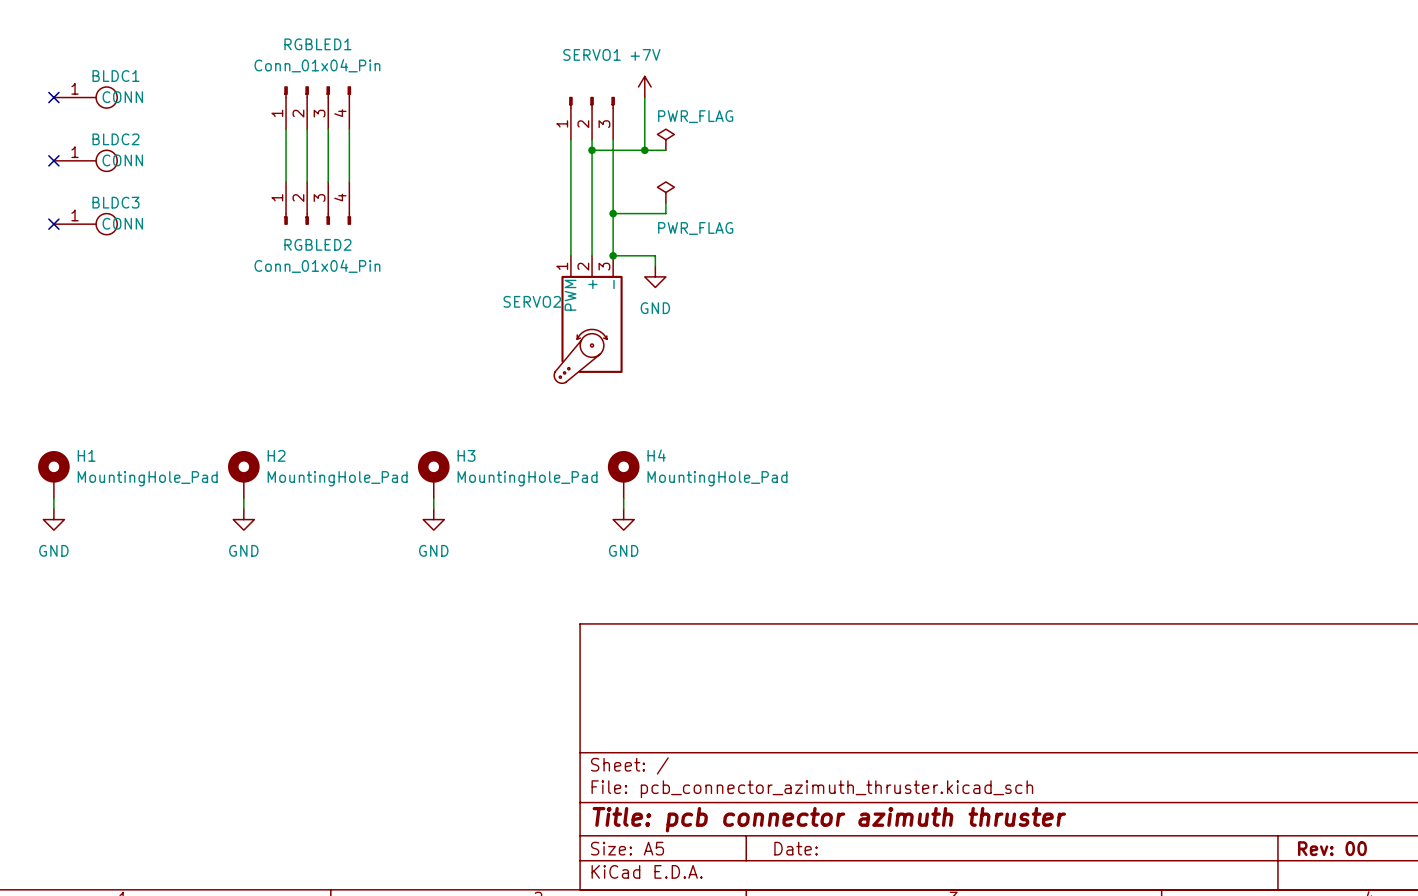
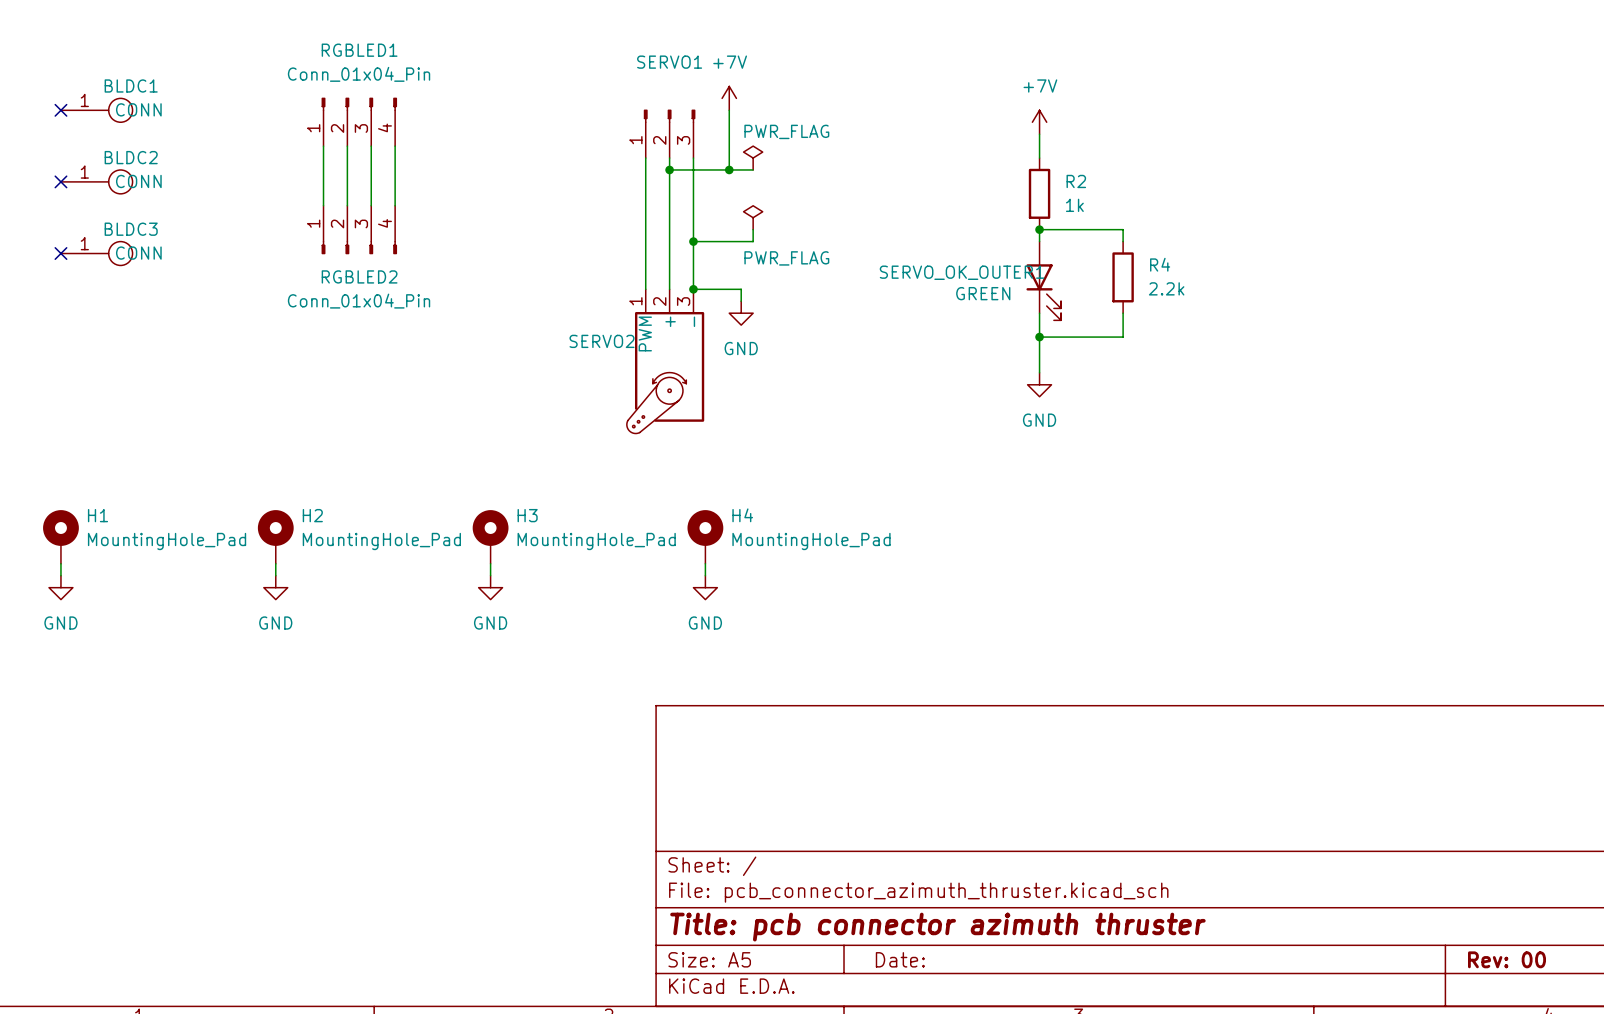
power symbol: none -> +7V (1039, 122)
wire: none -> (1039, 134) (1039, 158)
R2: none -> 1k (1039, 193)
junction: none -> (1039, 229)
wire: none -> (1039, 241) (1039, 229) (1123, 229) (1123, 241)
R4: none -> 2.2k (1123, 277)
SERVO_OK_OUTER1: none -> GREEN (1043, 280)
wire: none -> (1039, 313) (1039, 372)
wire: none -> (1123, 313) (1123, 337) (1039, 337)
junction: none -> (1039, 337)
power symbol: none -> GND (1039, 384)

